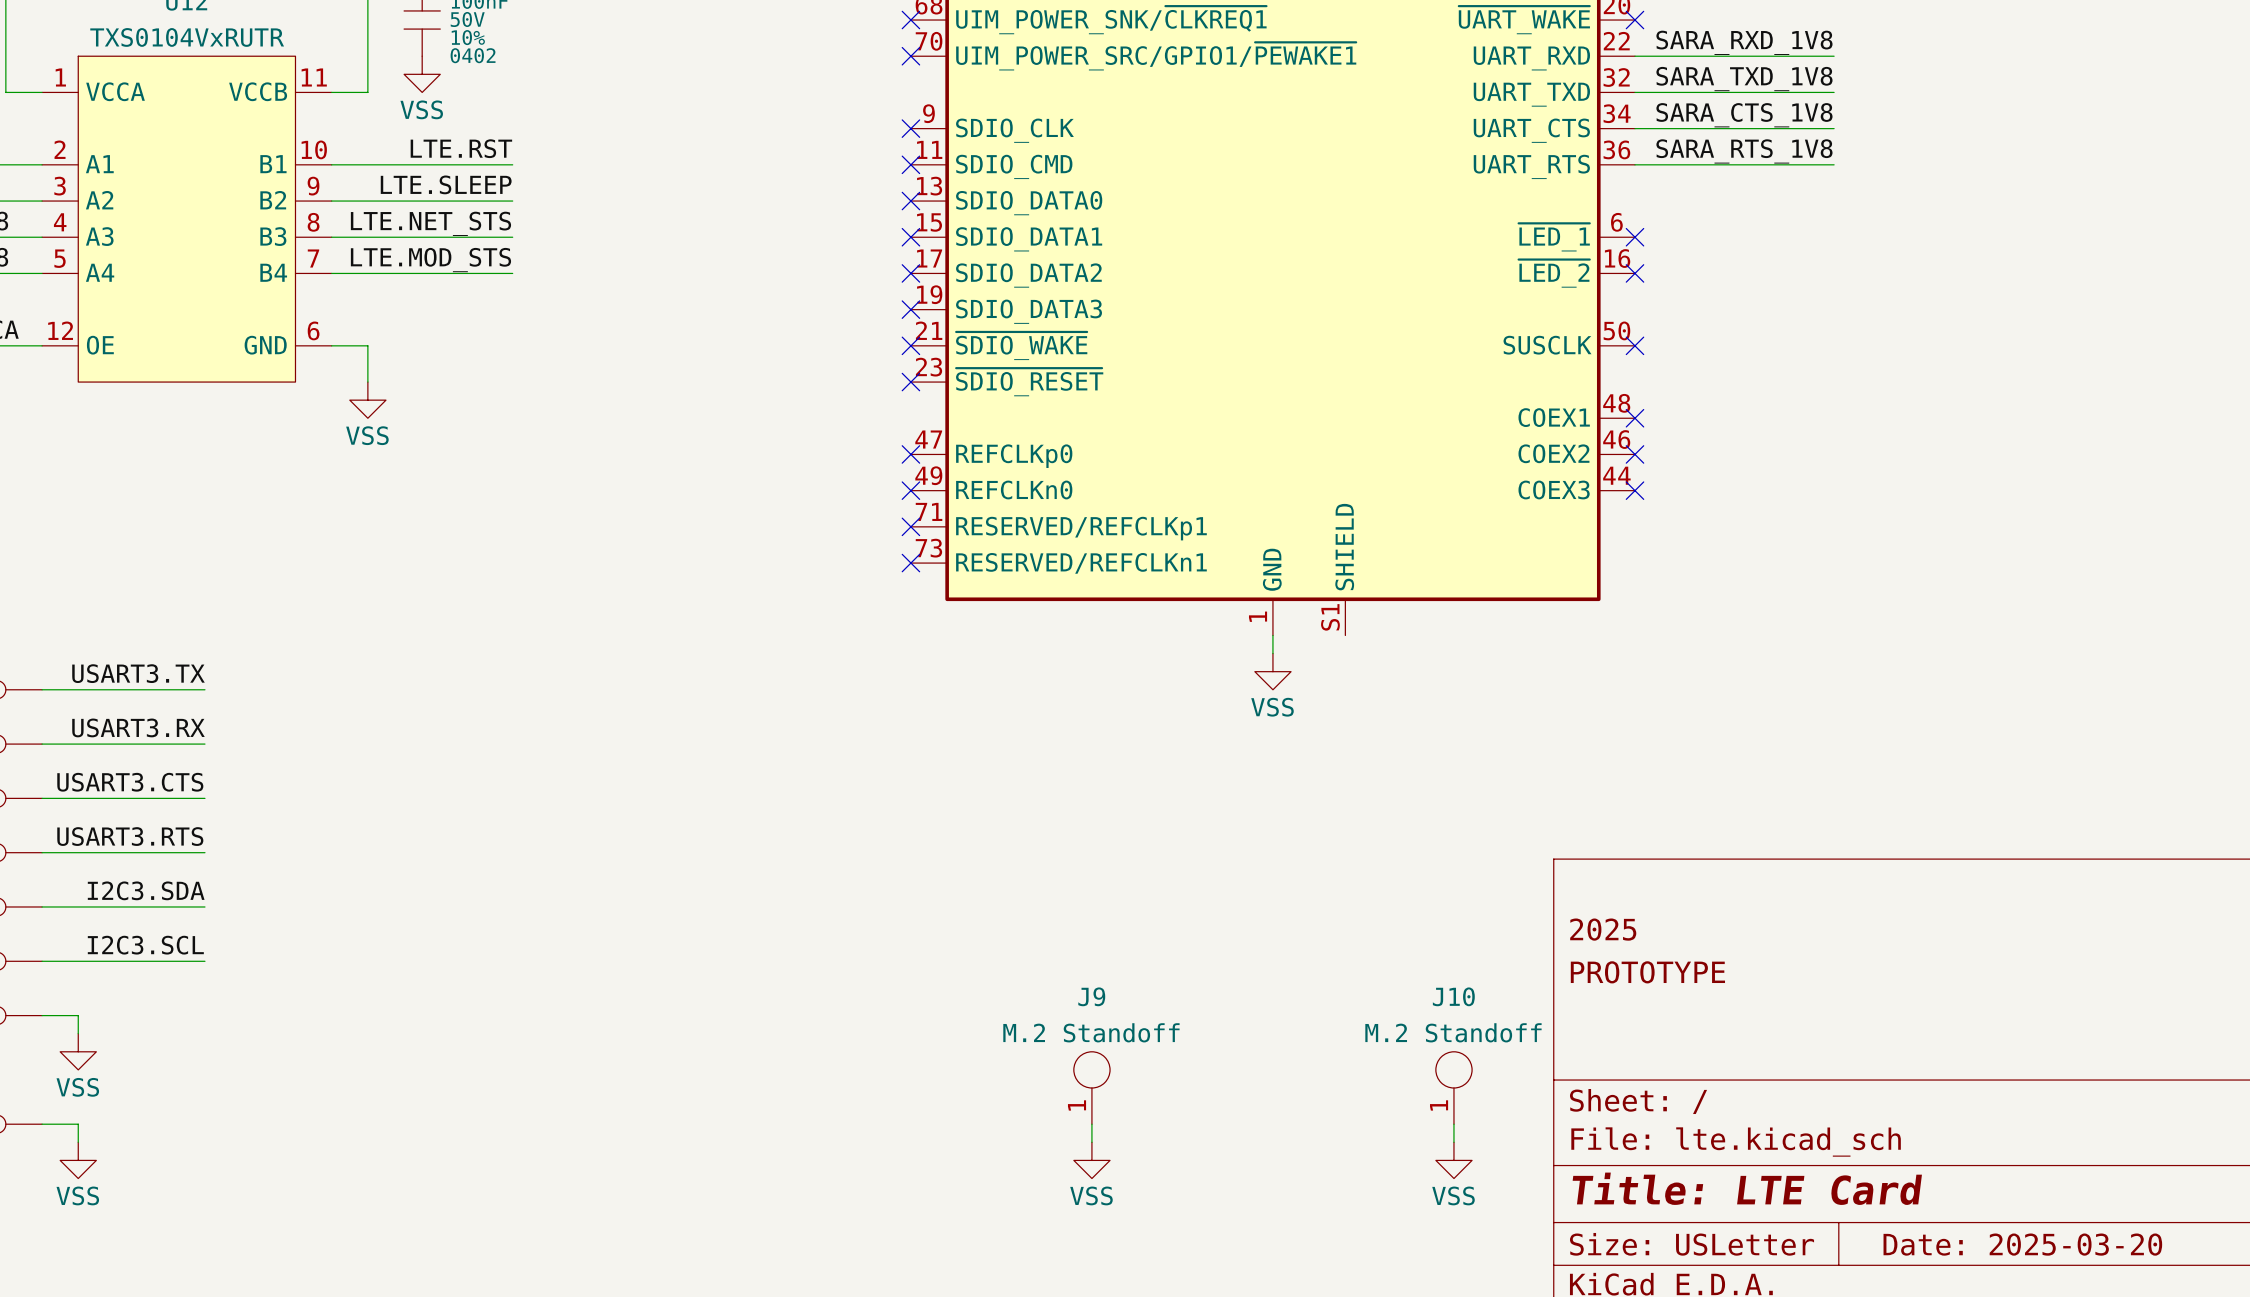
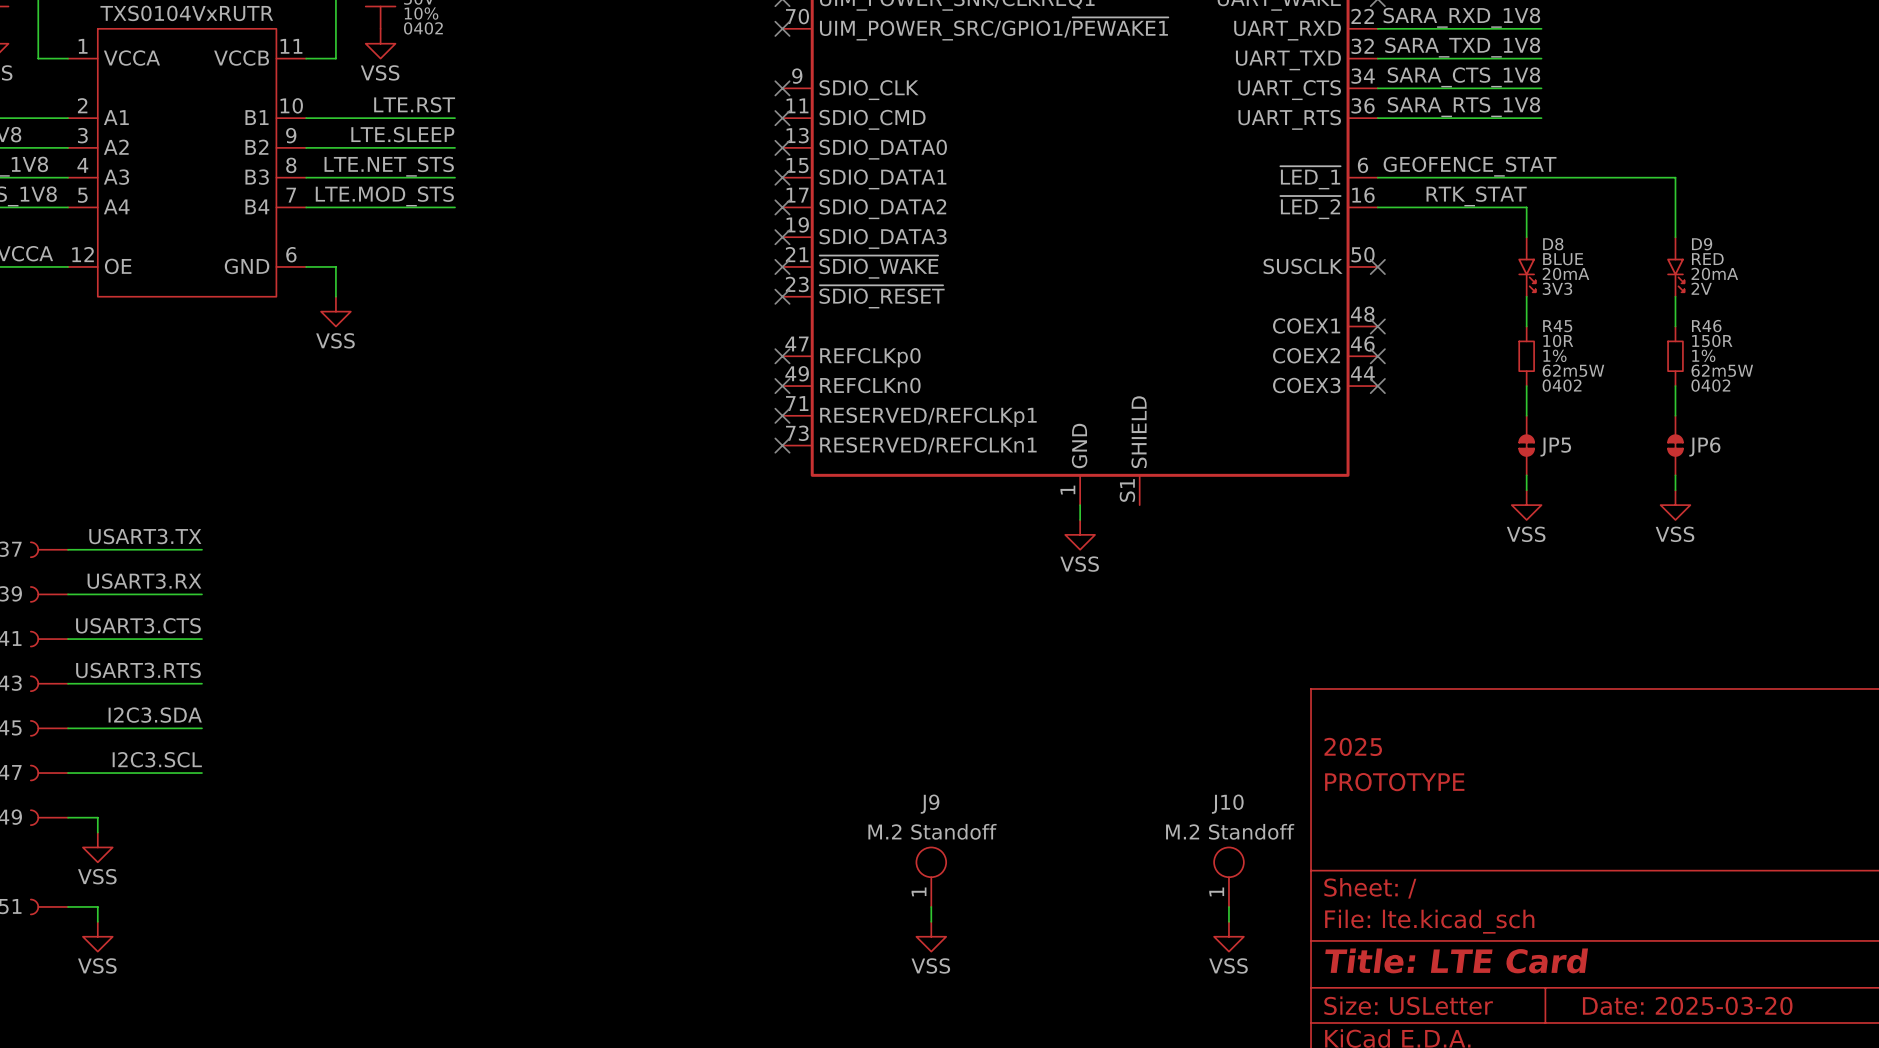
label: none -> GEOFENCE_STAT (1470, 166)
wire: none -> (1377, 177) (1675, 177) (1675, 237)
no-connect mark: (1634, 237) -> none
label: none -> RTK_STAT (1476, 196)
wire: none -> (1377, 207) (1526, 207) (1526, 237)
no-connect mark: (1634, 273) -> none
D8: none -> (1526, 266)
D9: none -> (1675, 266)
wire: none -> (1526, 296) (1526, 326)
wire: none -> (1675, 296) (1675, 326)
R45: none -> 10R (1526, 356)
R46: none -> 150R (1675, 356)
wire: none -> (1526, 386) (1526, 415)
wire: none -> (1675, 386) (1675, 415)
JP5: none -> (1526, 445)
JP6: none -> (1675, 445)
wire: none -> (1526, 475) (1526, 490)
wire: none -> (1675, 475) (1675, 490)
power symbol: none -> VSS (1526, 505)
power symbol: none -> VSS (1675, 505)

